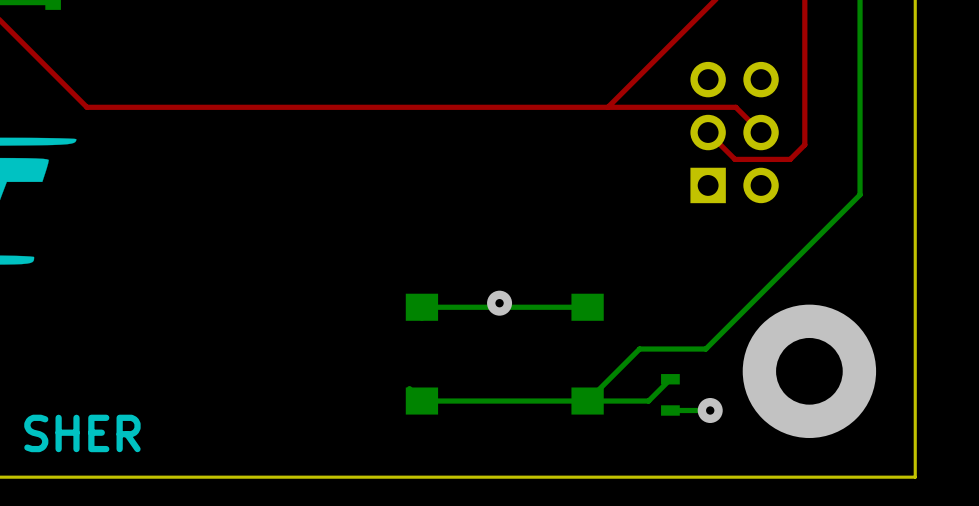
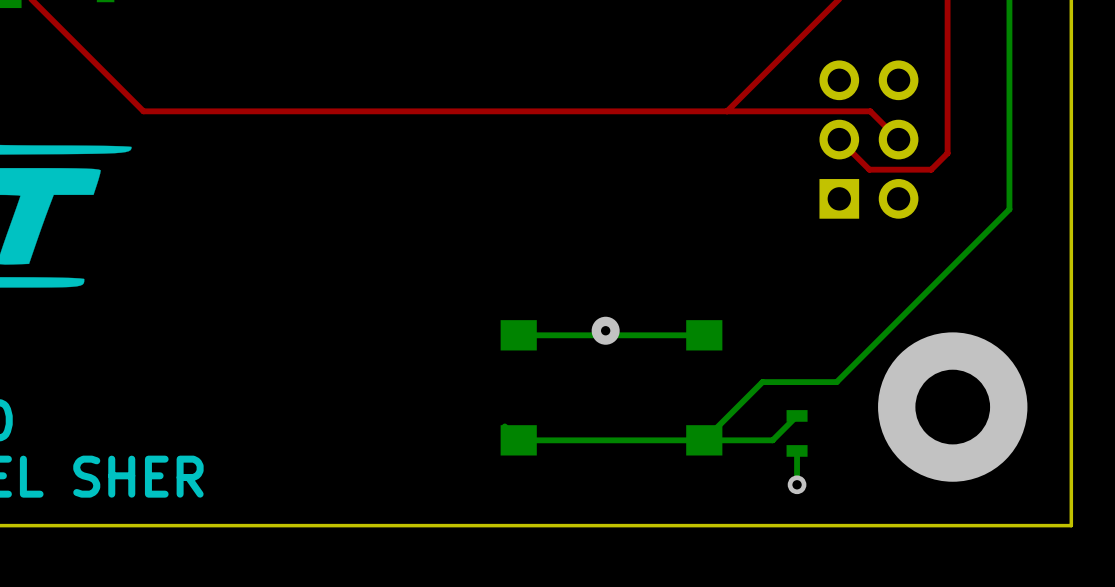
bottom track: (670, 410) (710, 410) -> (797, 450) (797, 484)
via: (710, 410) -> none
via: none -> (797, 484)

